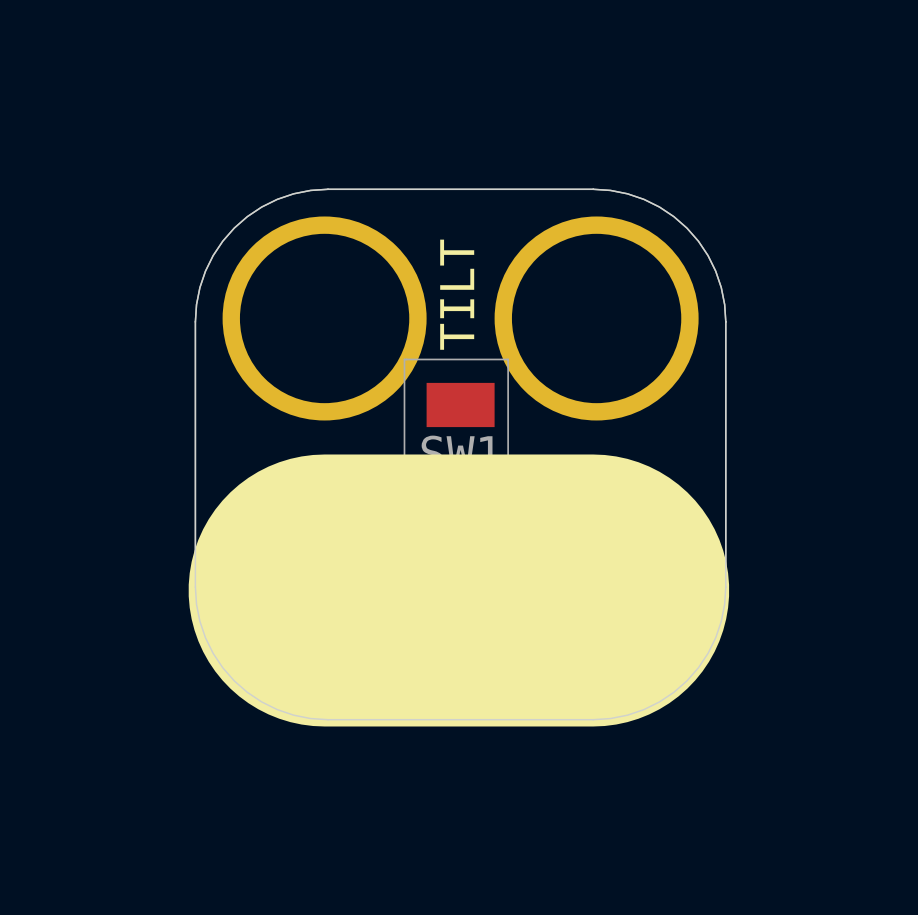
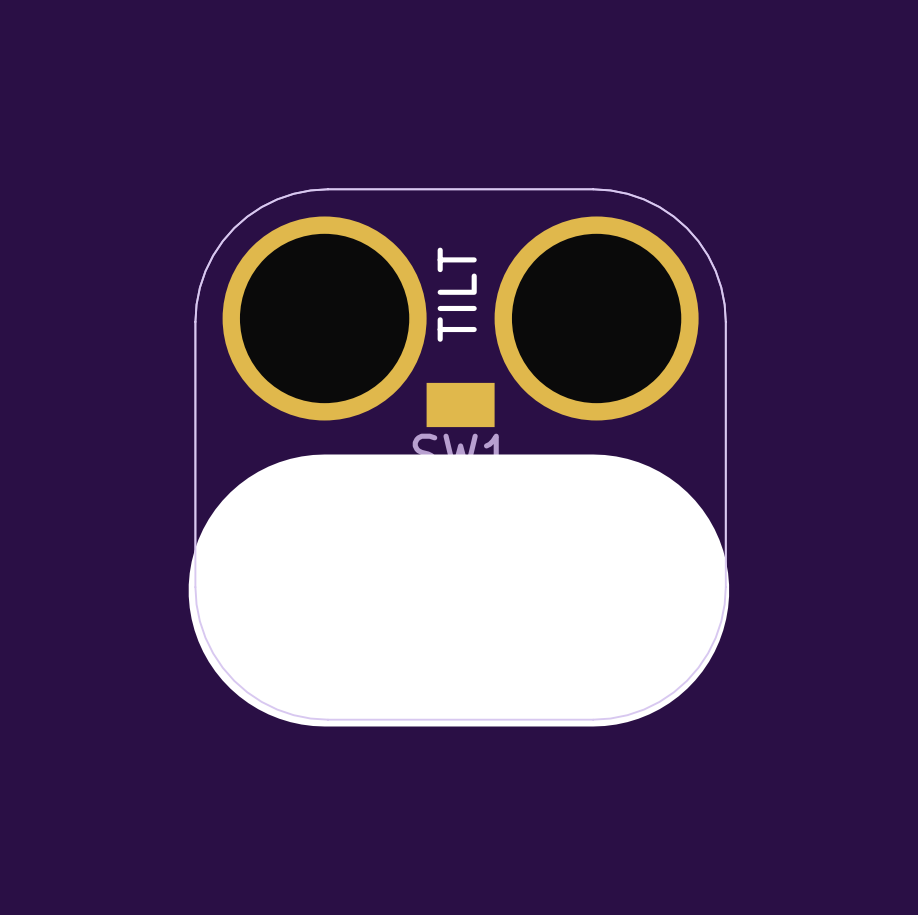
SW1 footprint: [188, 188, 730, 727] -> [188, 188, 730, 727]

